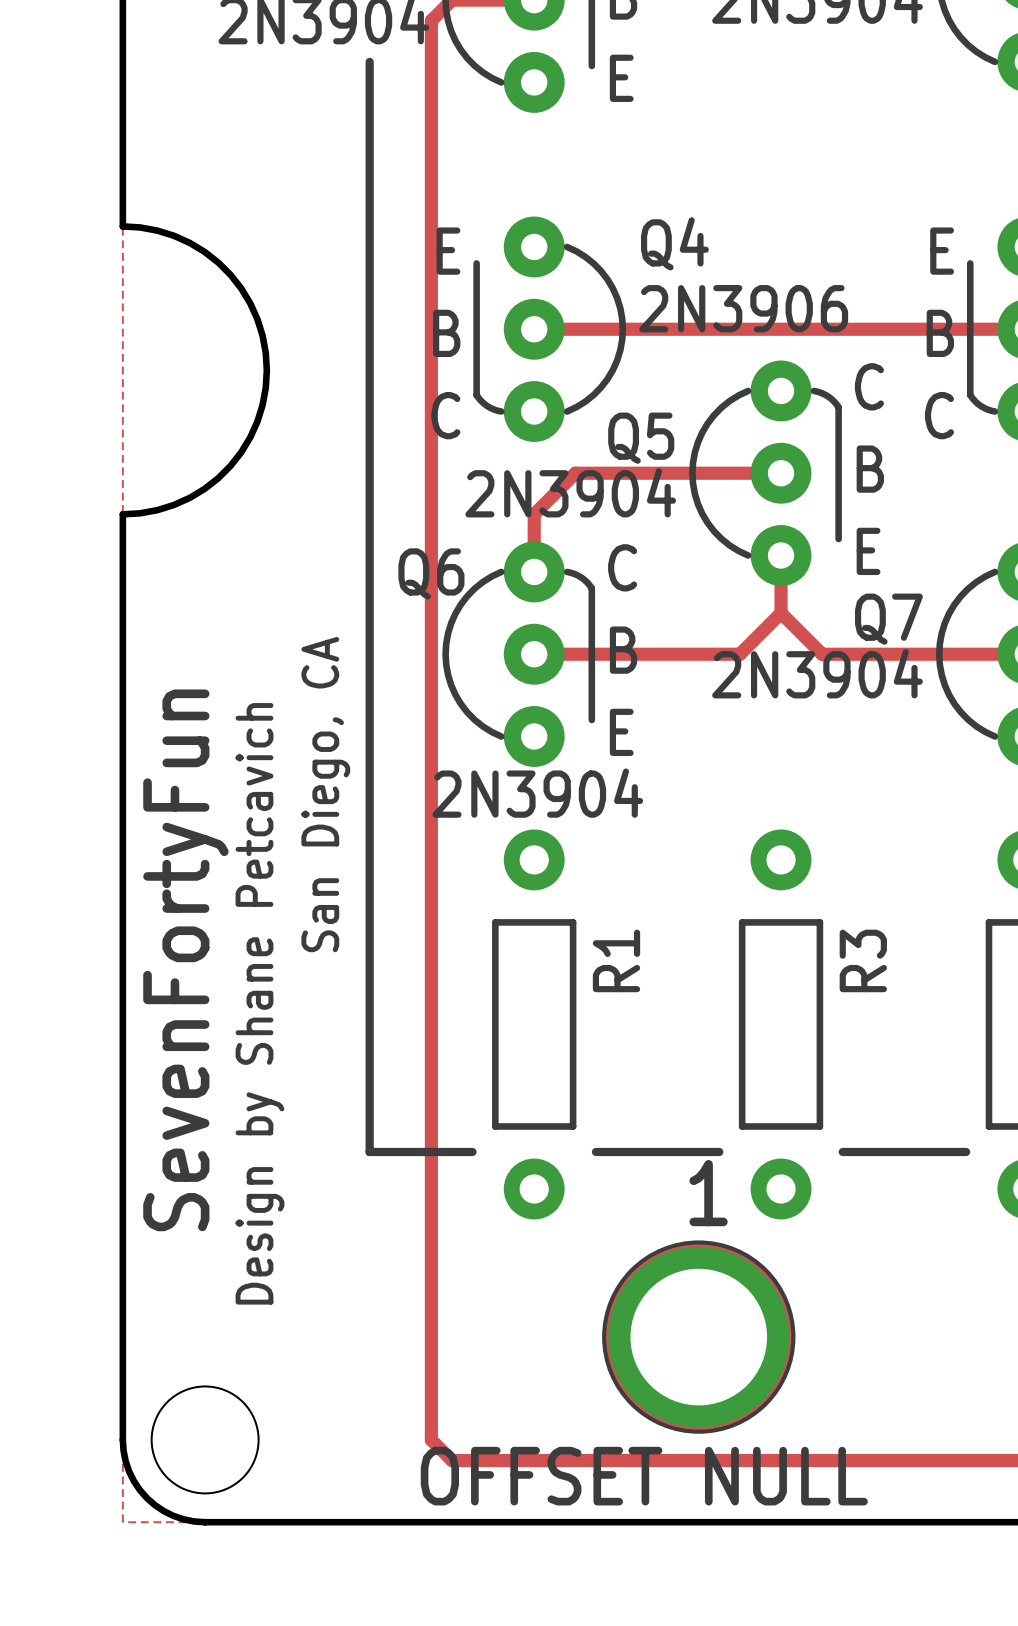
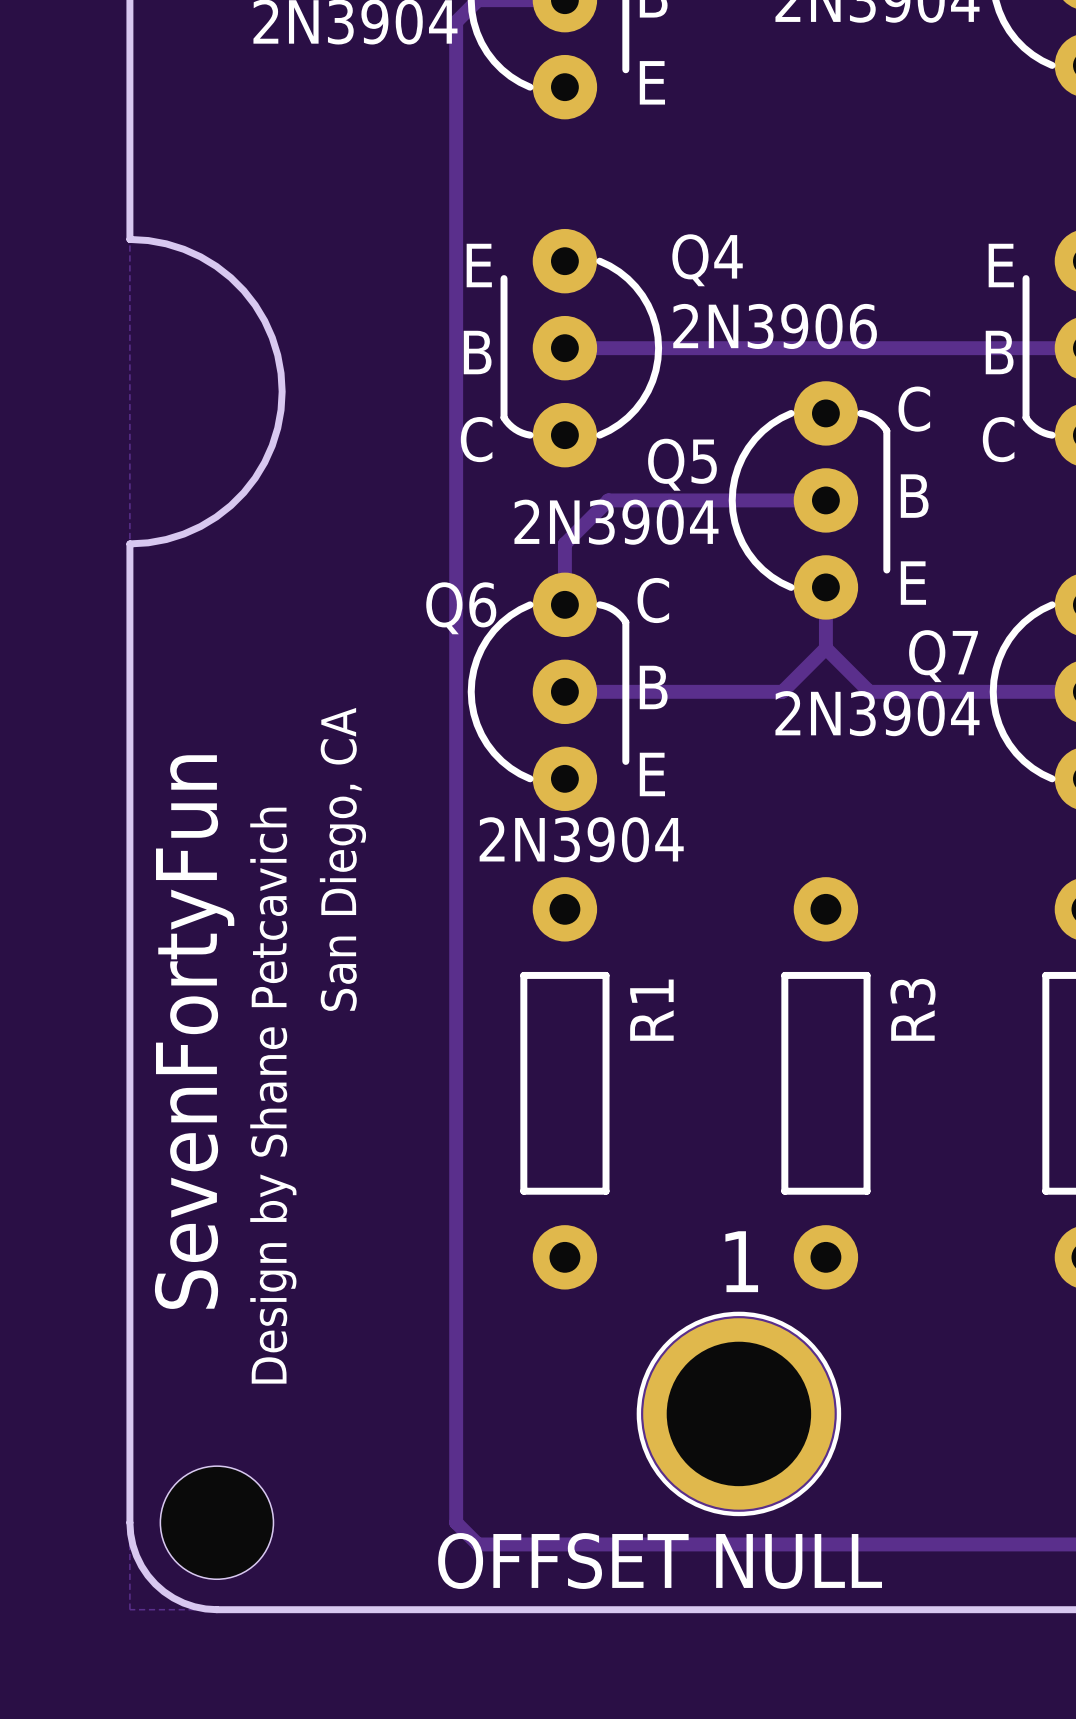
line: (369, 61) (369, 1151) (472, 1151) -> none
line: (595, 1151) (719, 1151) -> none
line: (842, 1151) (966, 1151) -> none

